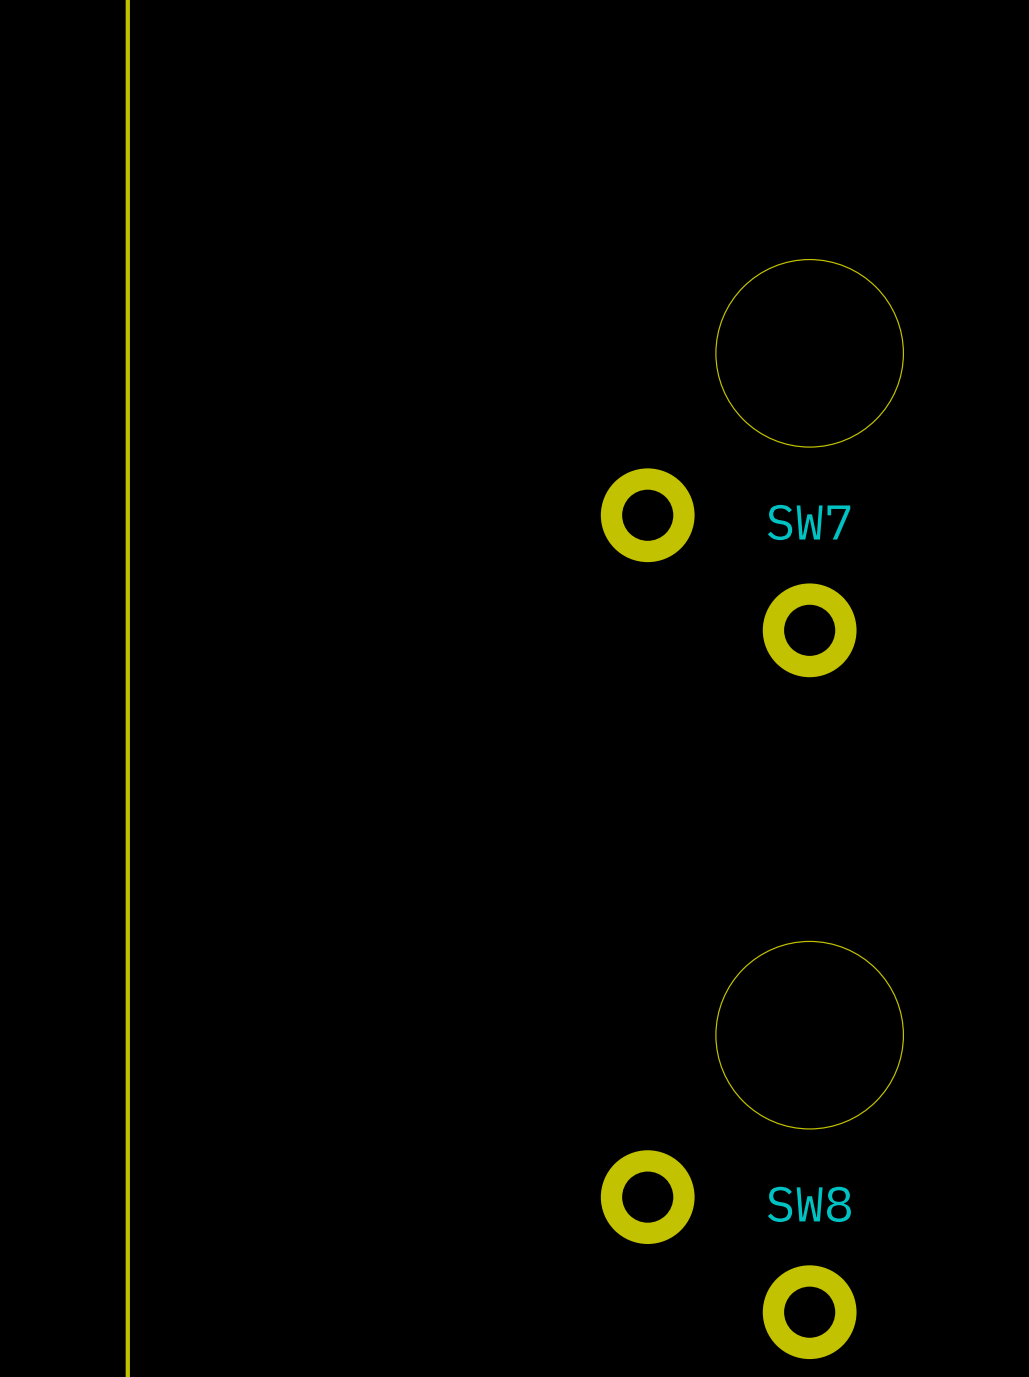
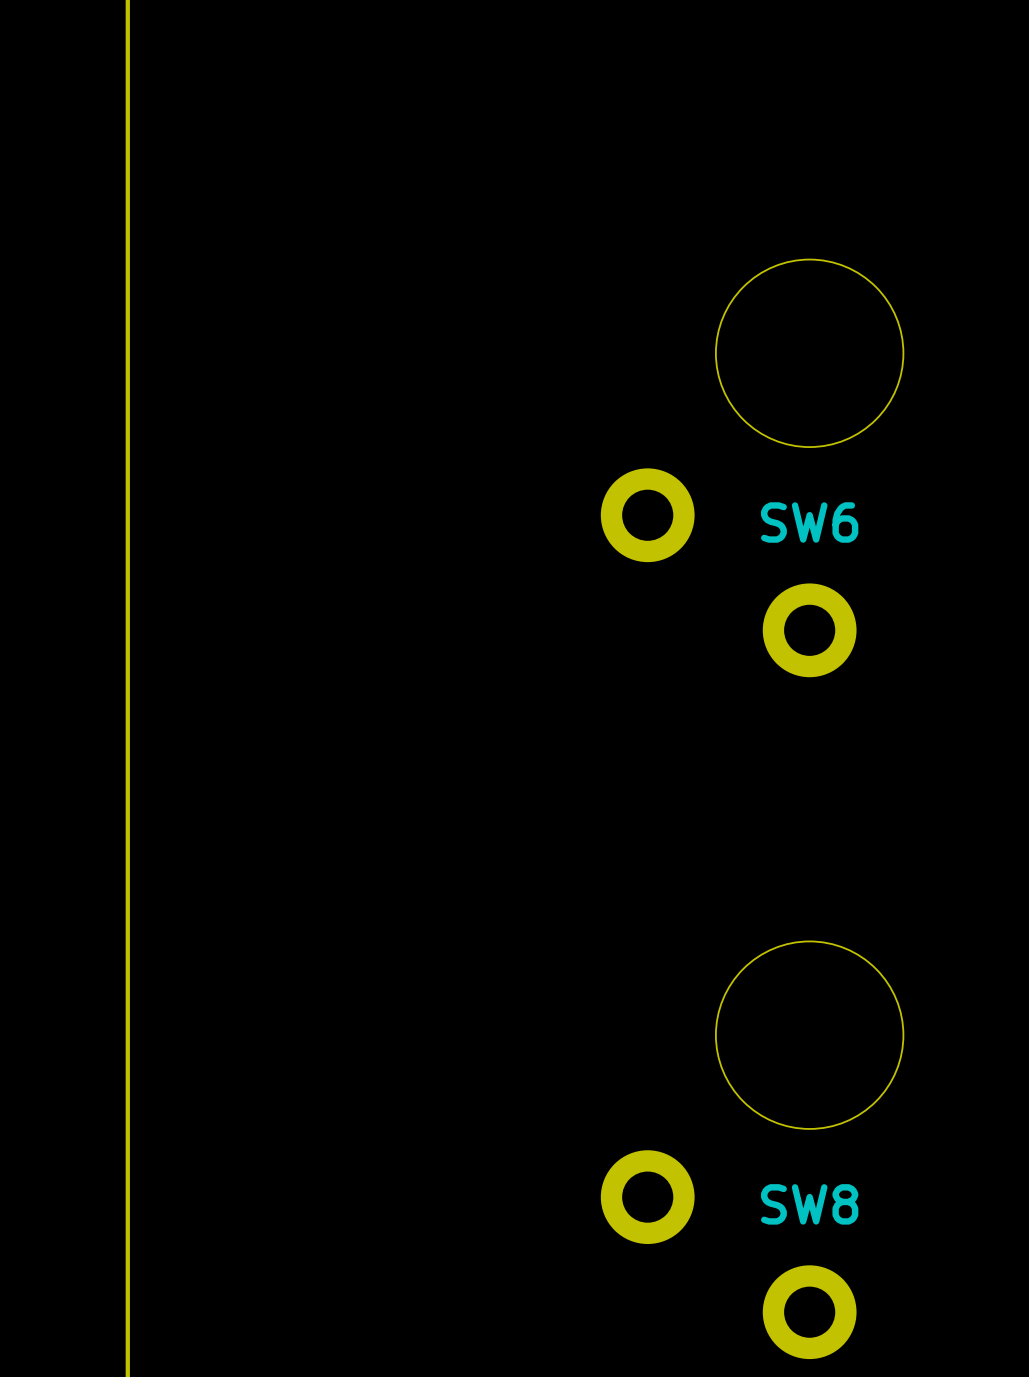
SW7 name: SW7 (809, 522) -> SW6 (809, 522)

